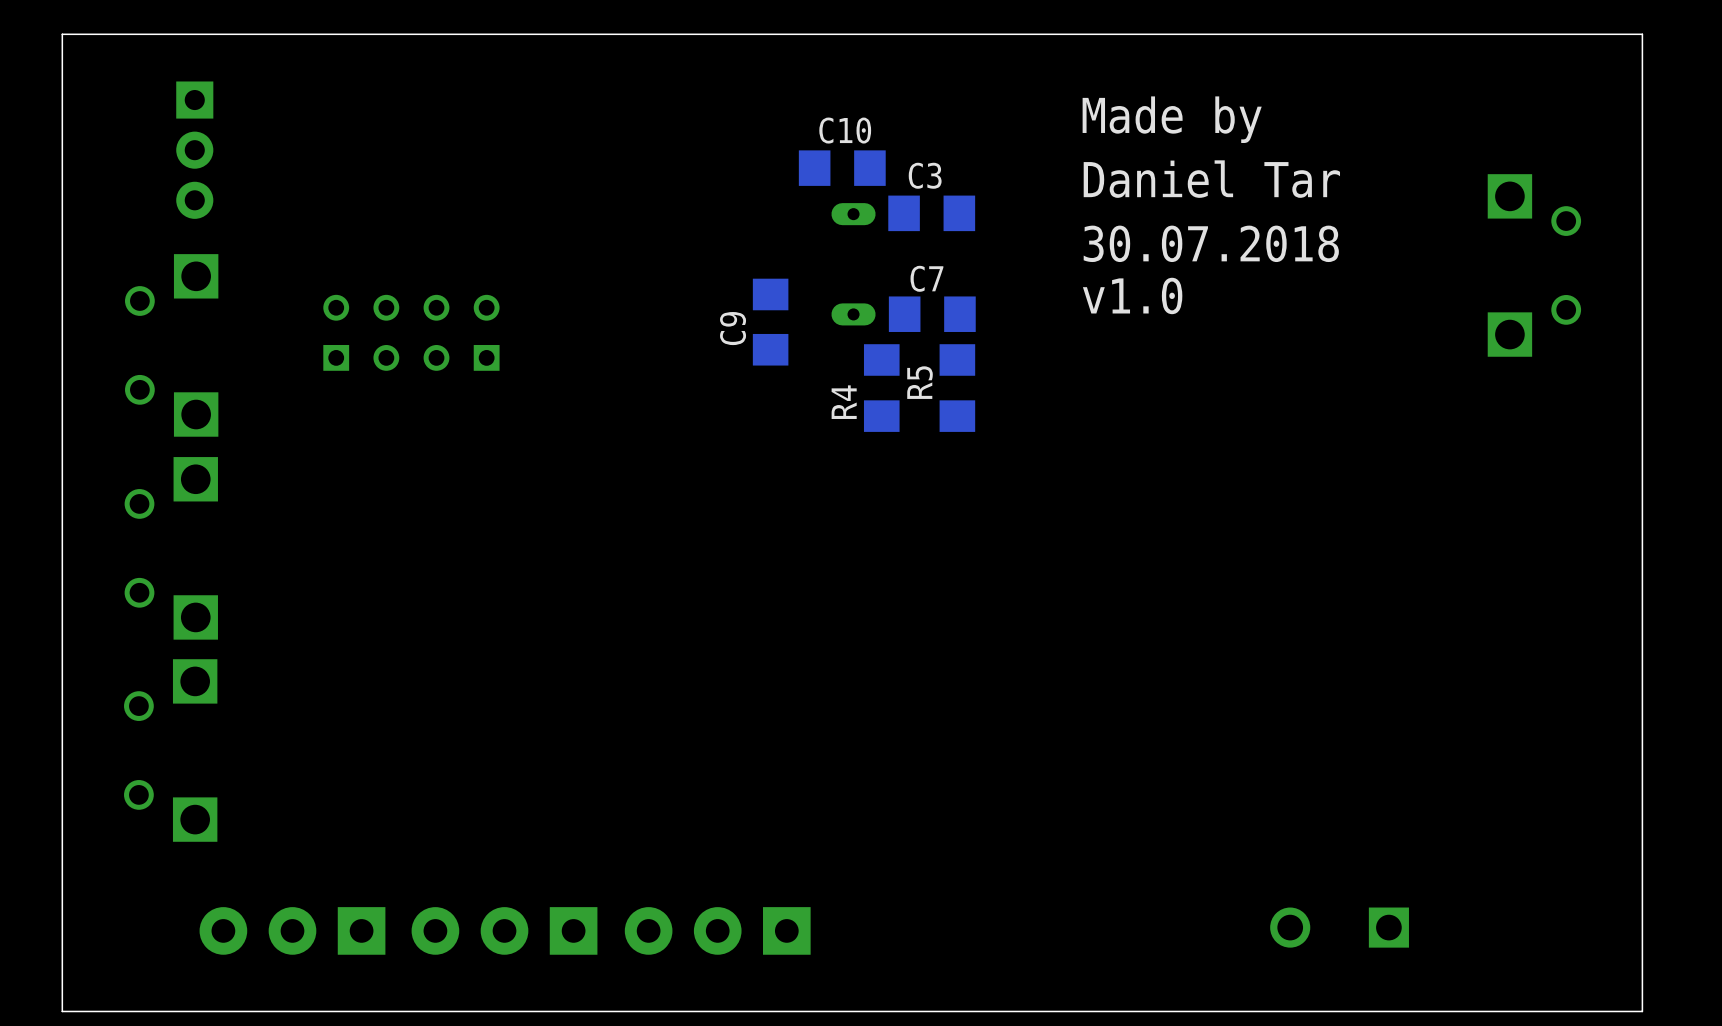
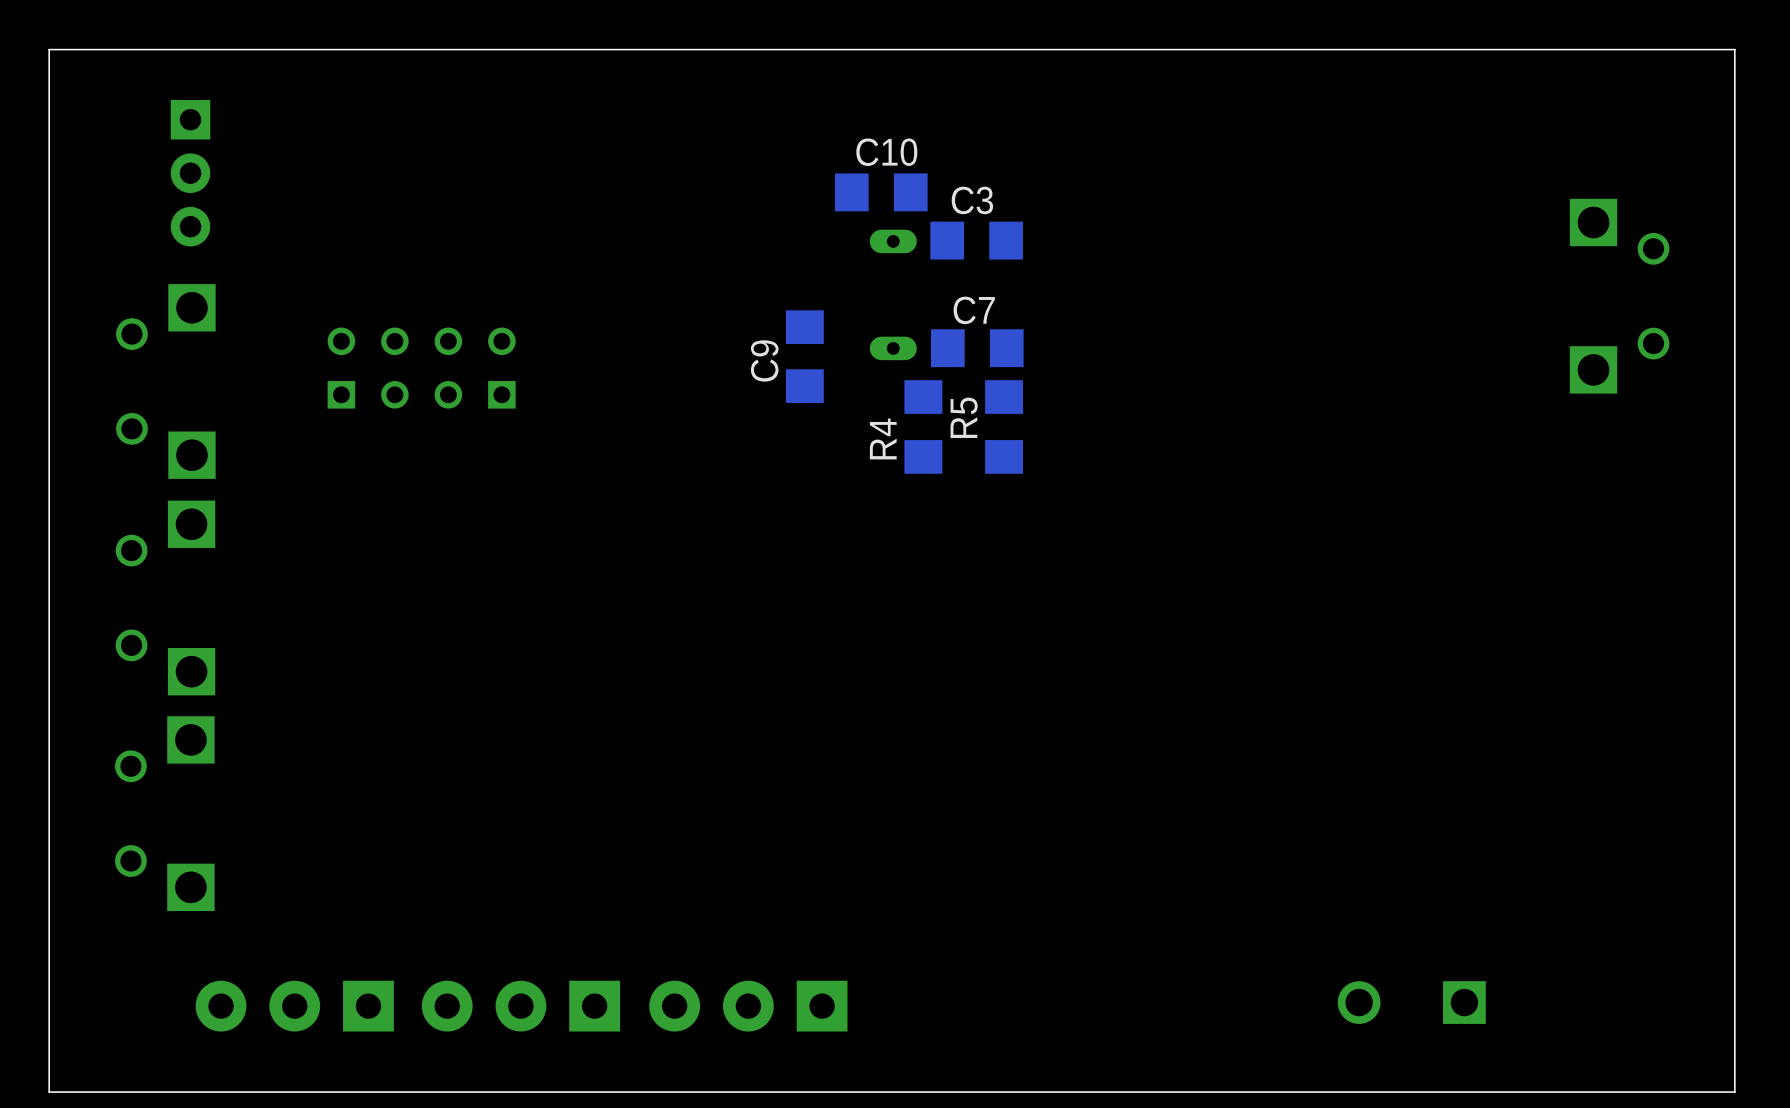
text: Made by (1172, 119) -> none
text: Daniel Tar (1211, 179) -> none
text: 30.07.2018 (1211, 243) -> none
text: v1.0 (1132, 295) -> none

